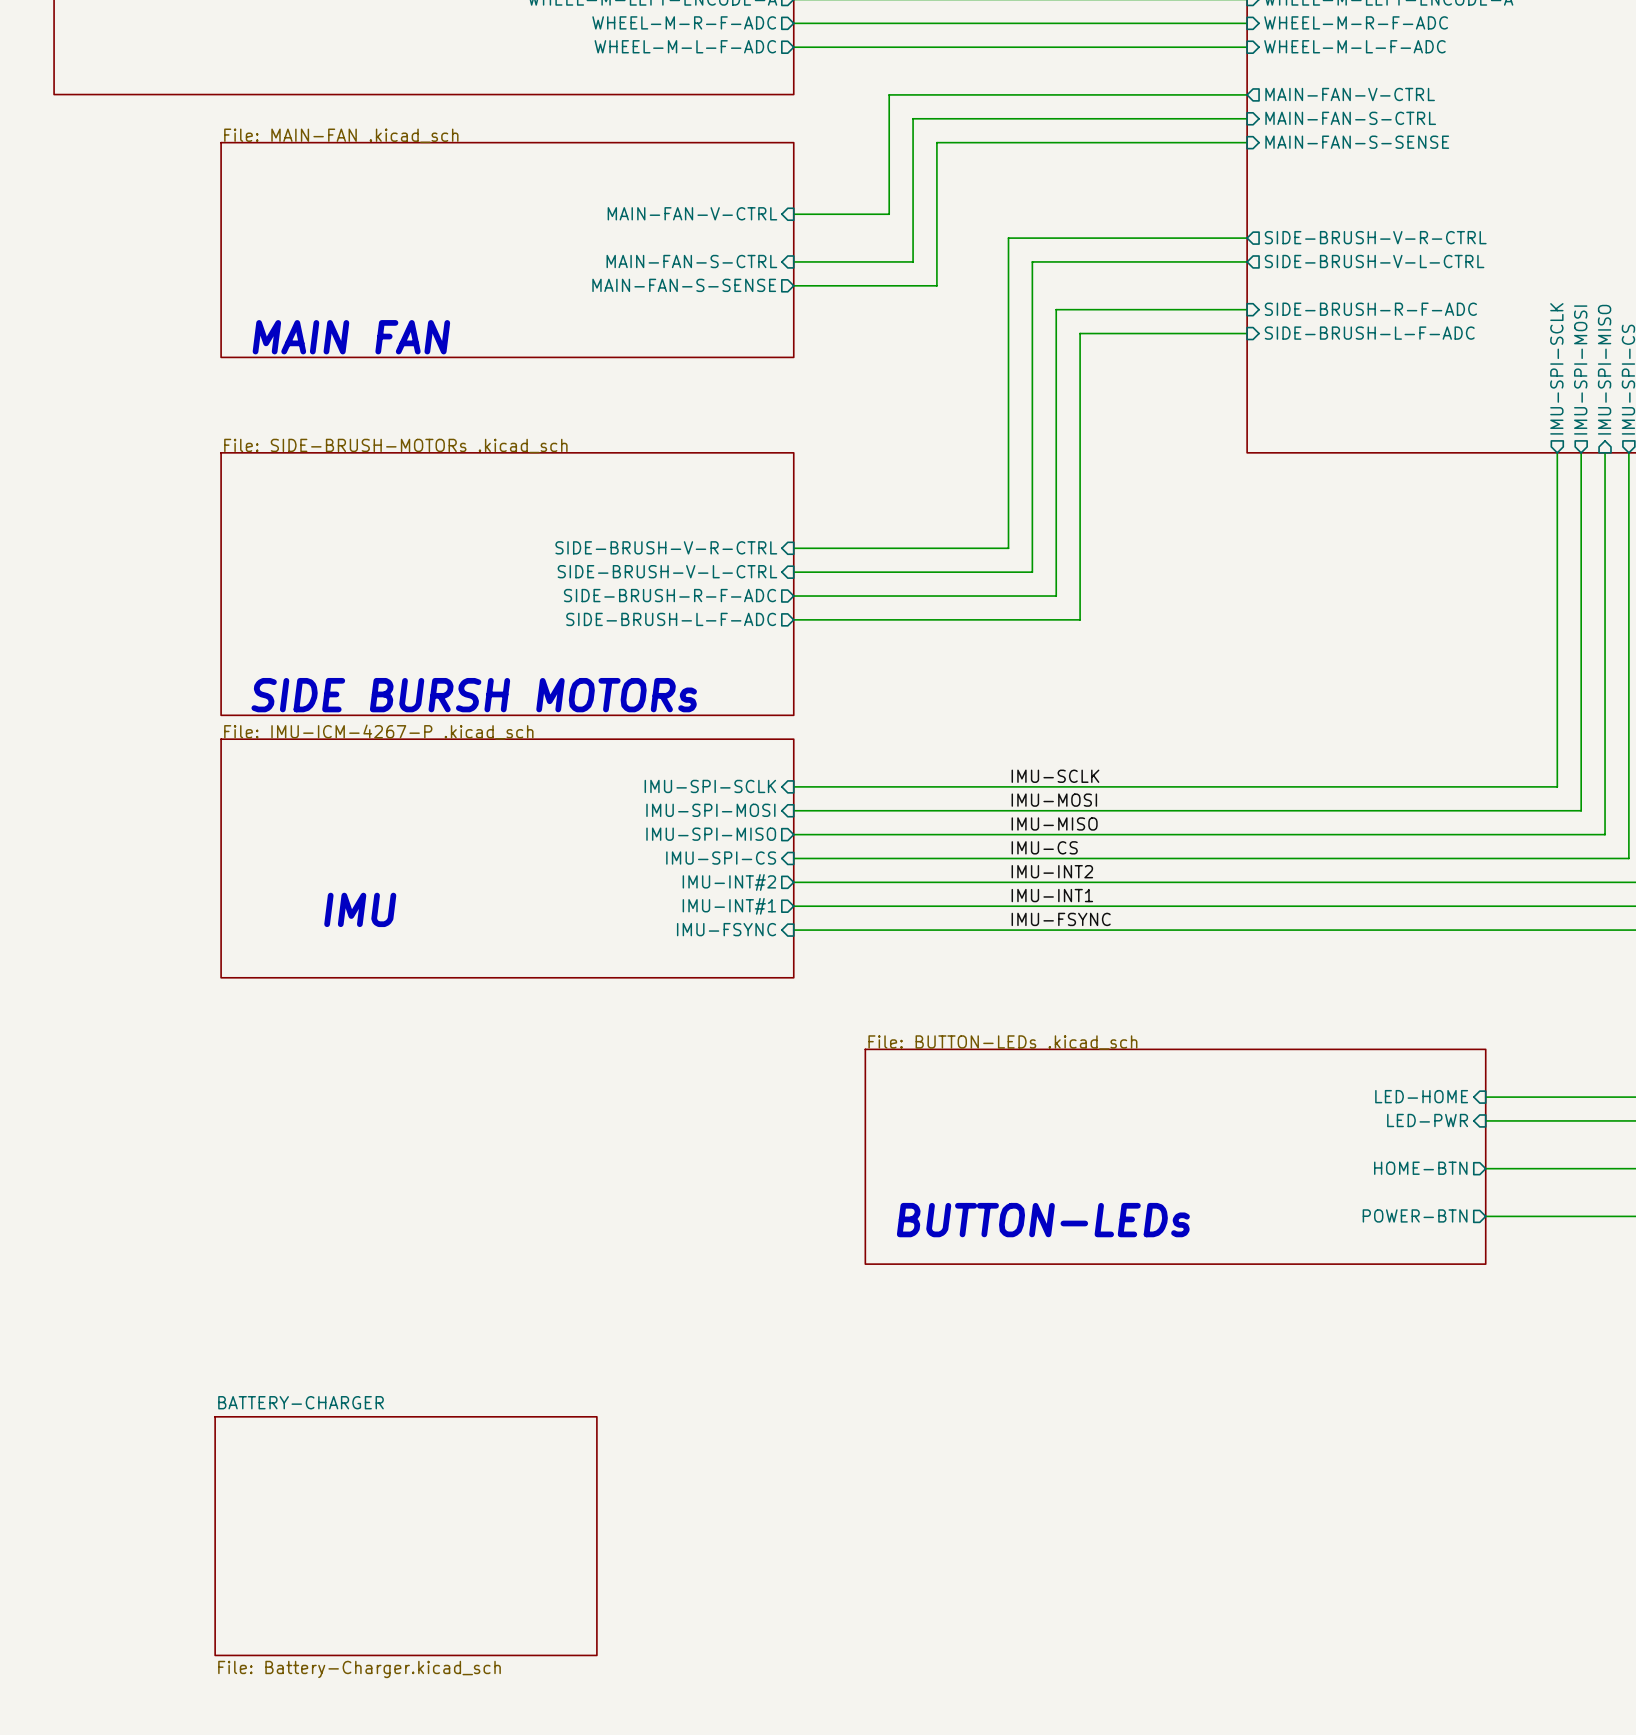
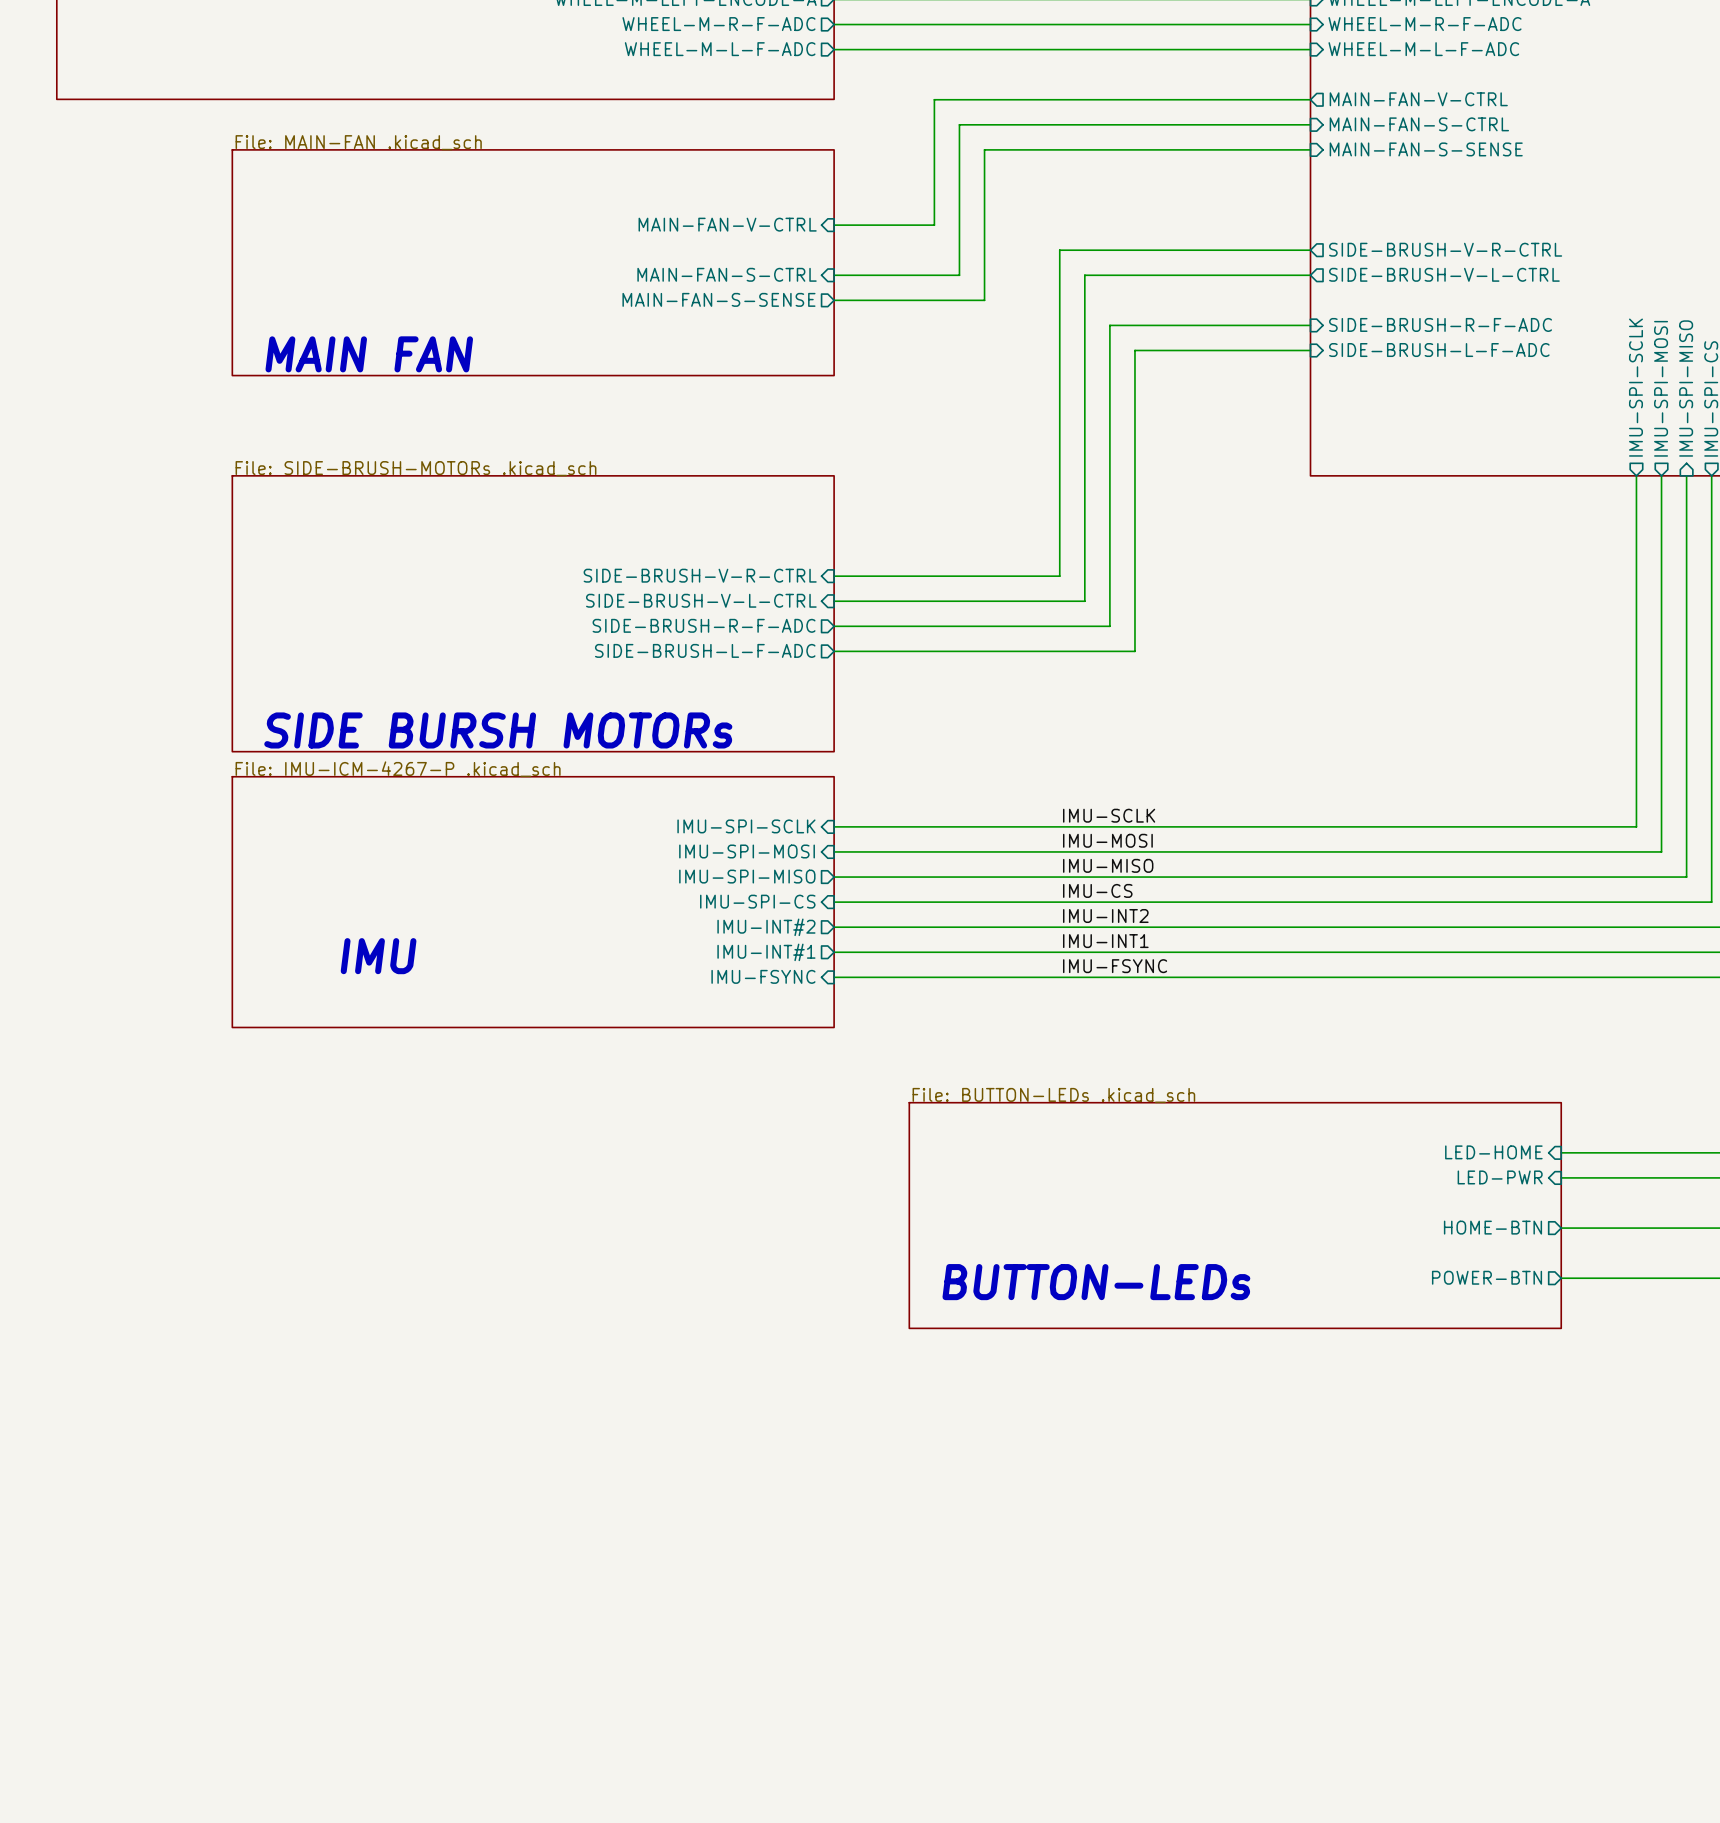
sheet BATTERY-CHARGER: File: Battery-Charger.kicad_sch (406, 1536) -> none

